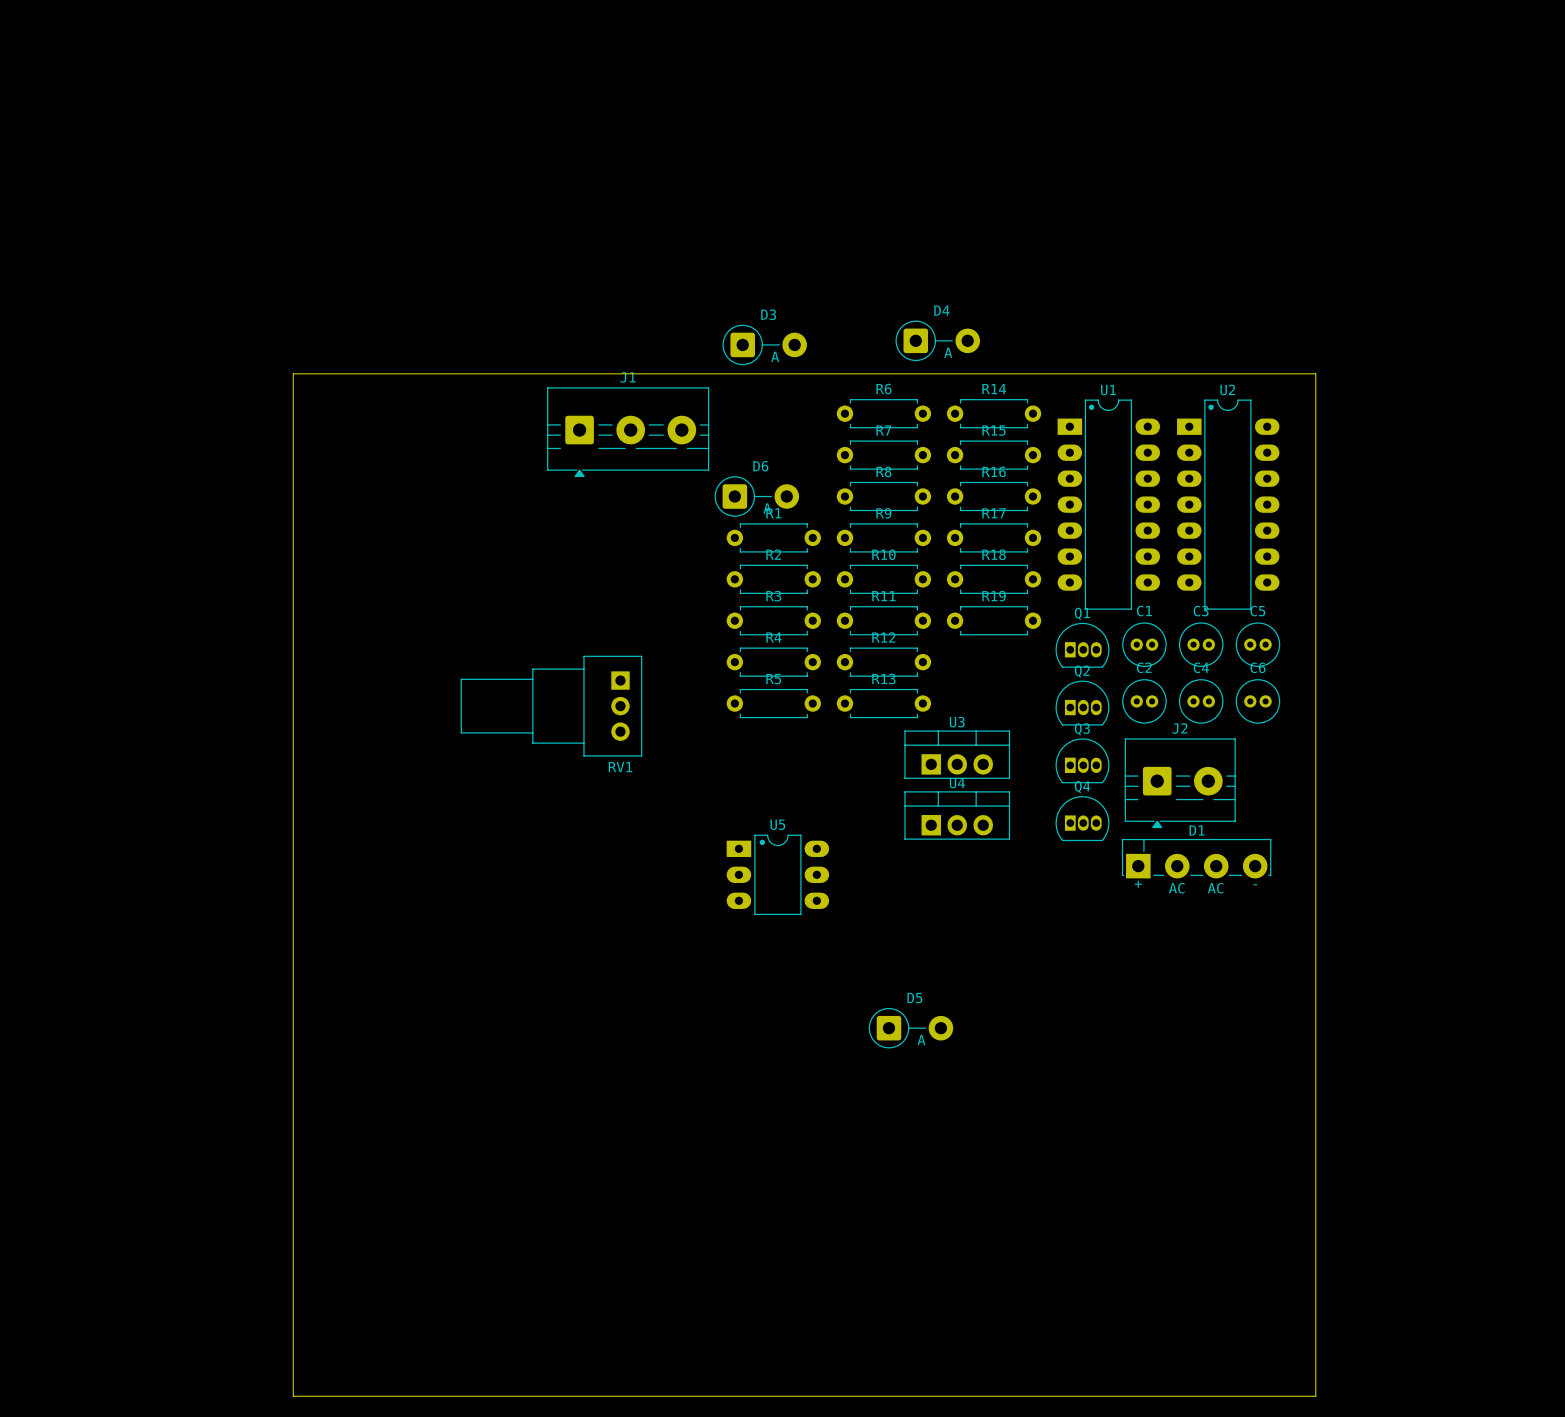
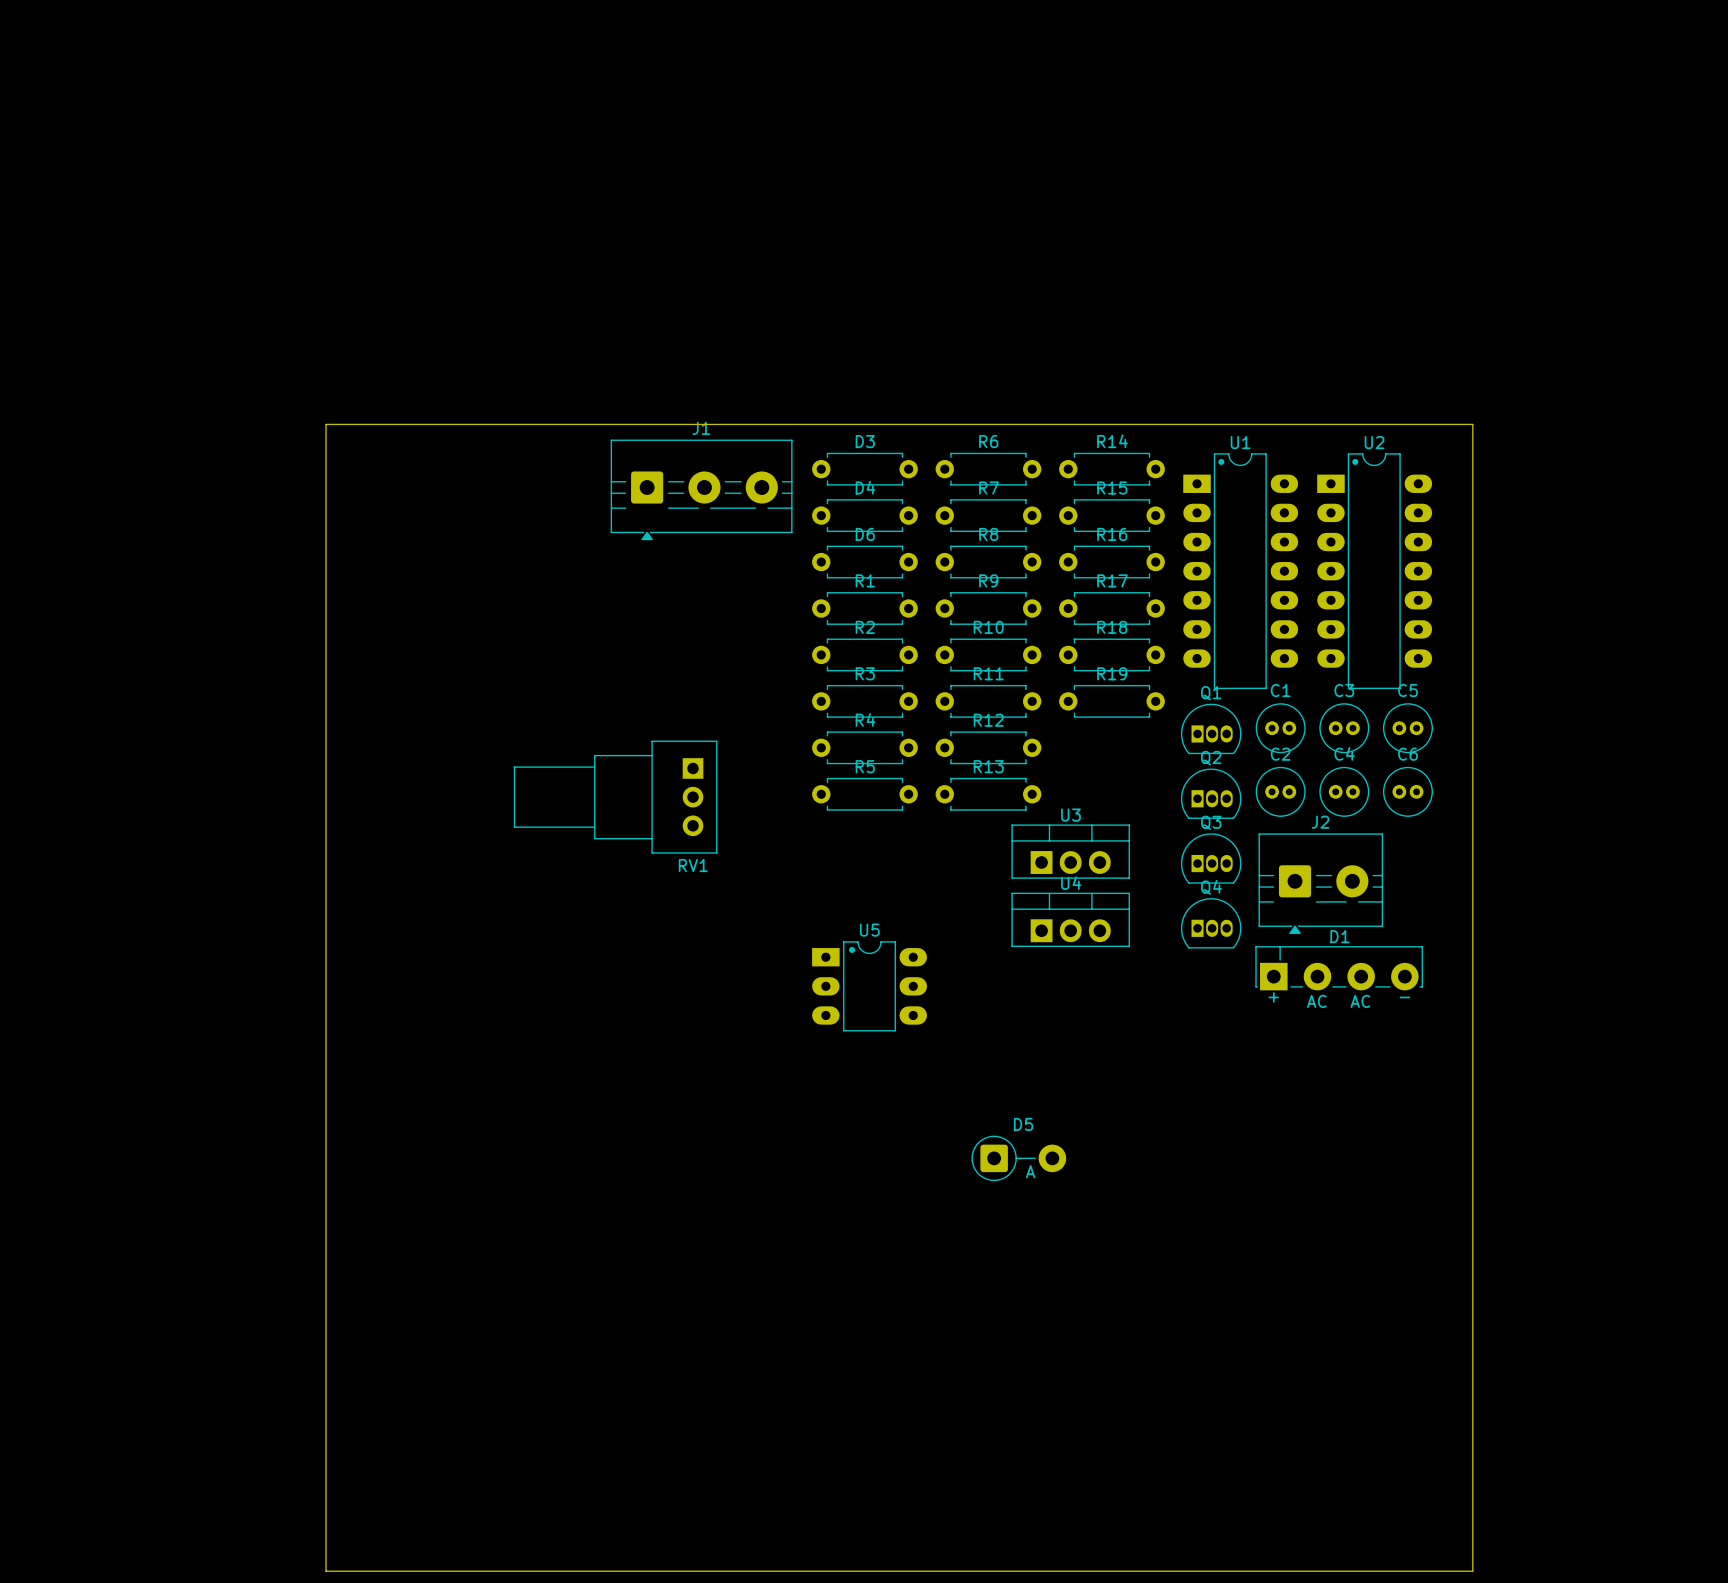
D4 footprint: [895, 320, 980, 362] -> [812, 499, 918, 533]
D3 footprint: [722, 324, 807, 366] -> [812, 452, 918, 486]
D6 footprint: [714, 476, 800, 517] -> [812, 545, 918, 579]

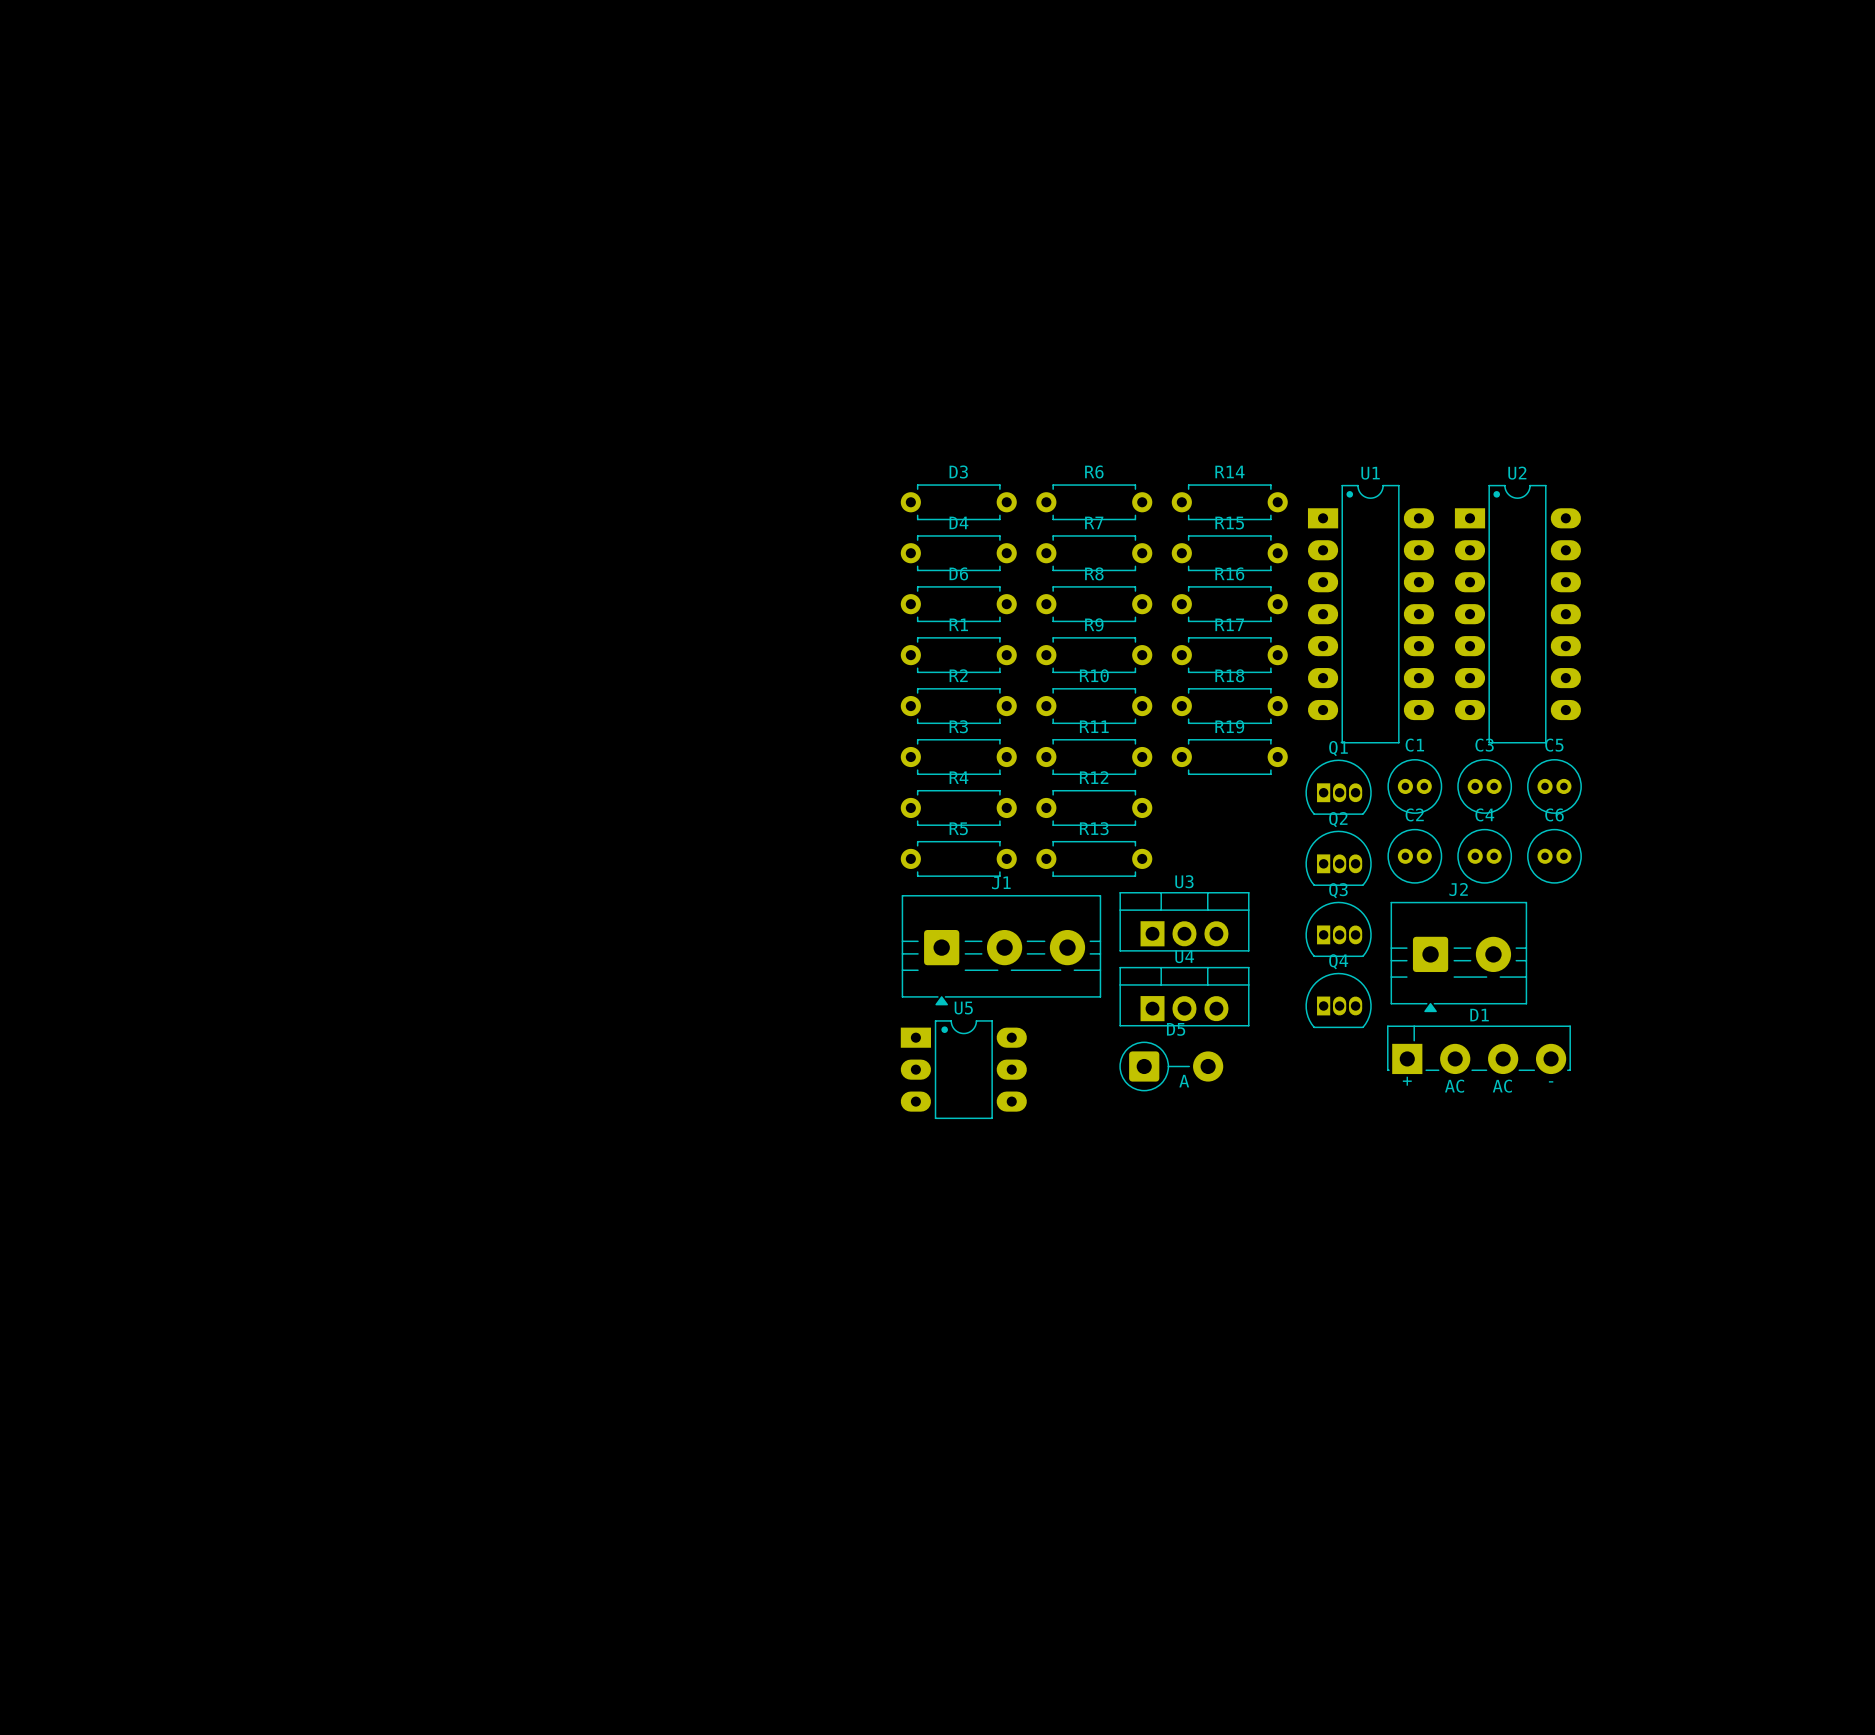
board edge: (326, 424) (1472, 424) (1472, 1571) (326, 1571) (326, 424) -> none
J1 position: (701, 489) -> (1001, 950)
RV1: (615, 797) -> none
D5 position: (1018, 1158) -> (1171, 1066)

